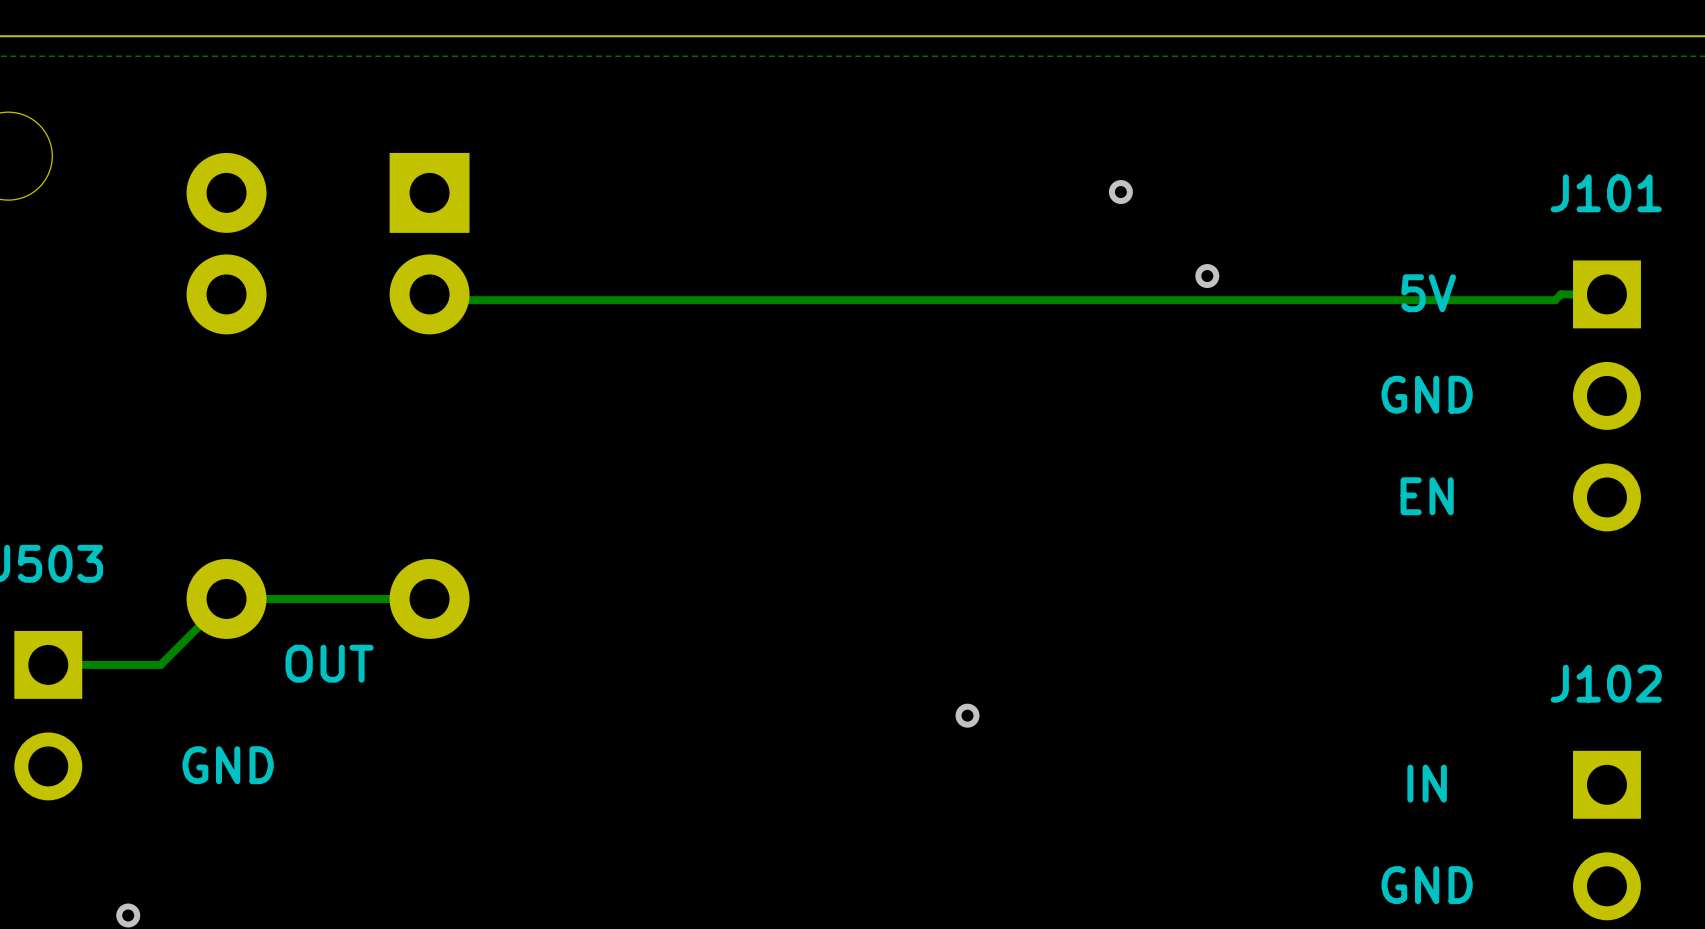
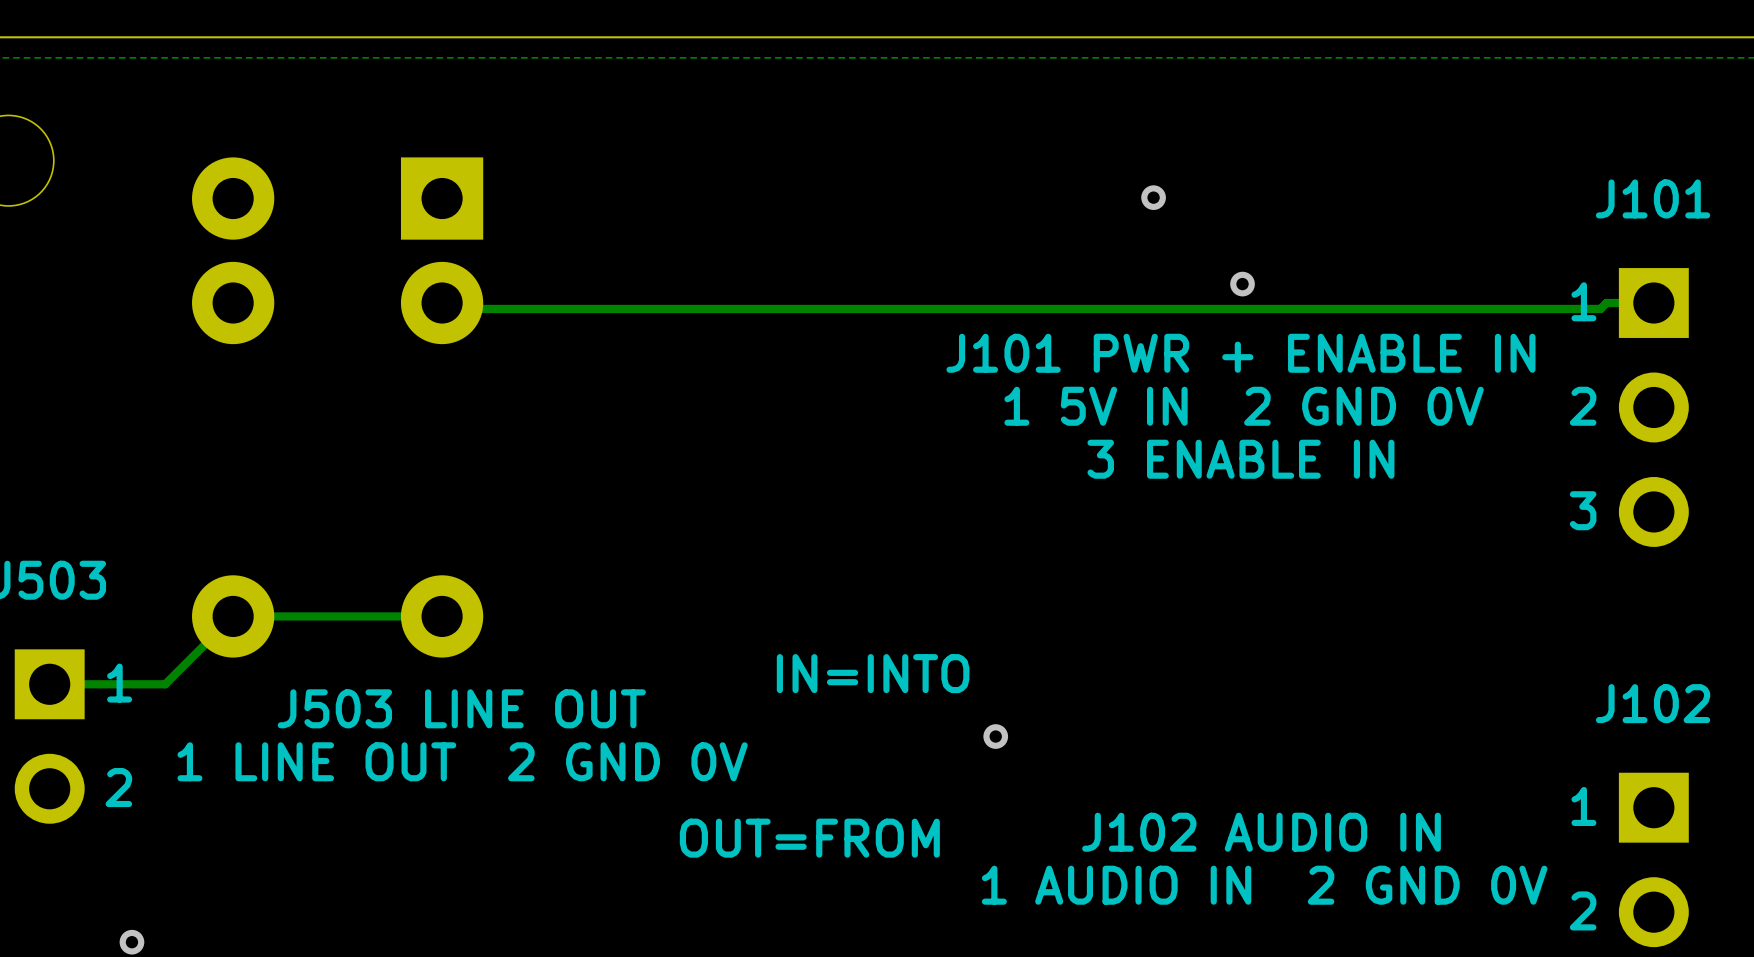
text: 5V (1428, 293) -> none
text: none -> 1 (1583, 301)
text: none -> J101 PWR + ENABLE IN (1240, 353)
text: none -> 1 5V IN 2 GND 0V (1244, 406)
text: GND (1427, 394) -> none
text: none -> 2 (1583, 406)
text: none -> 3 ENABLE IN (1240, 459)
text: EN (1427, 496) -> none
text: none -> 3 (1583, 510)
text: none -> IN=INTO (873, 673)
text: none -> 1 (119, 683)
text: OUT (329, 663) -> none
text: none -> J503 LINE OUT (461, 708)
text: none -> 1 LINE OUT 2 GND 0V (462, 761)
text: none -> 2 (118, 787)
text: GND (228, 765) -> none
text: IN (1427, 783) -> none
text: none -> 1 (1583, 806)
text: none -> J102 AUDIO IN (1261, 832)
text: none -> OUT=FROM (809, 838)
text: none -> 1 AUDIO IN 2 GND 0V (1264, 885)
text: GND (1427, 885) -> none
text: none -> 2 (1583, 910)

